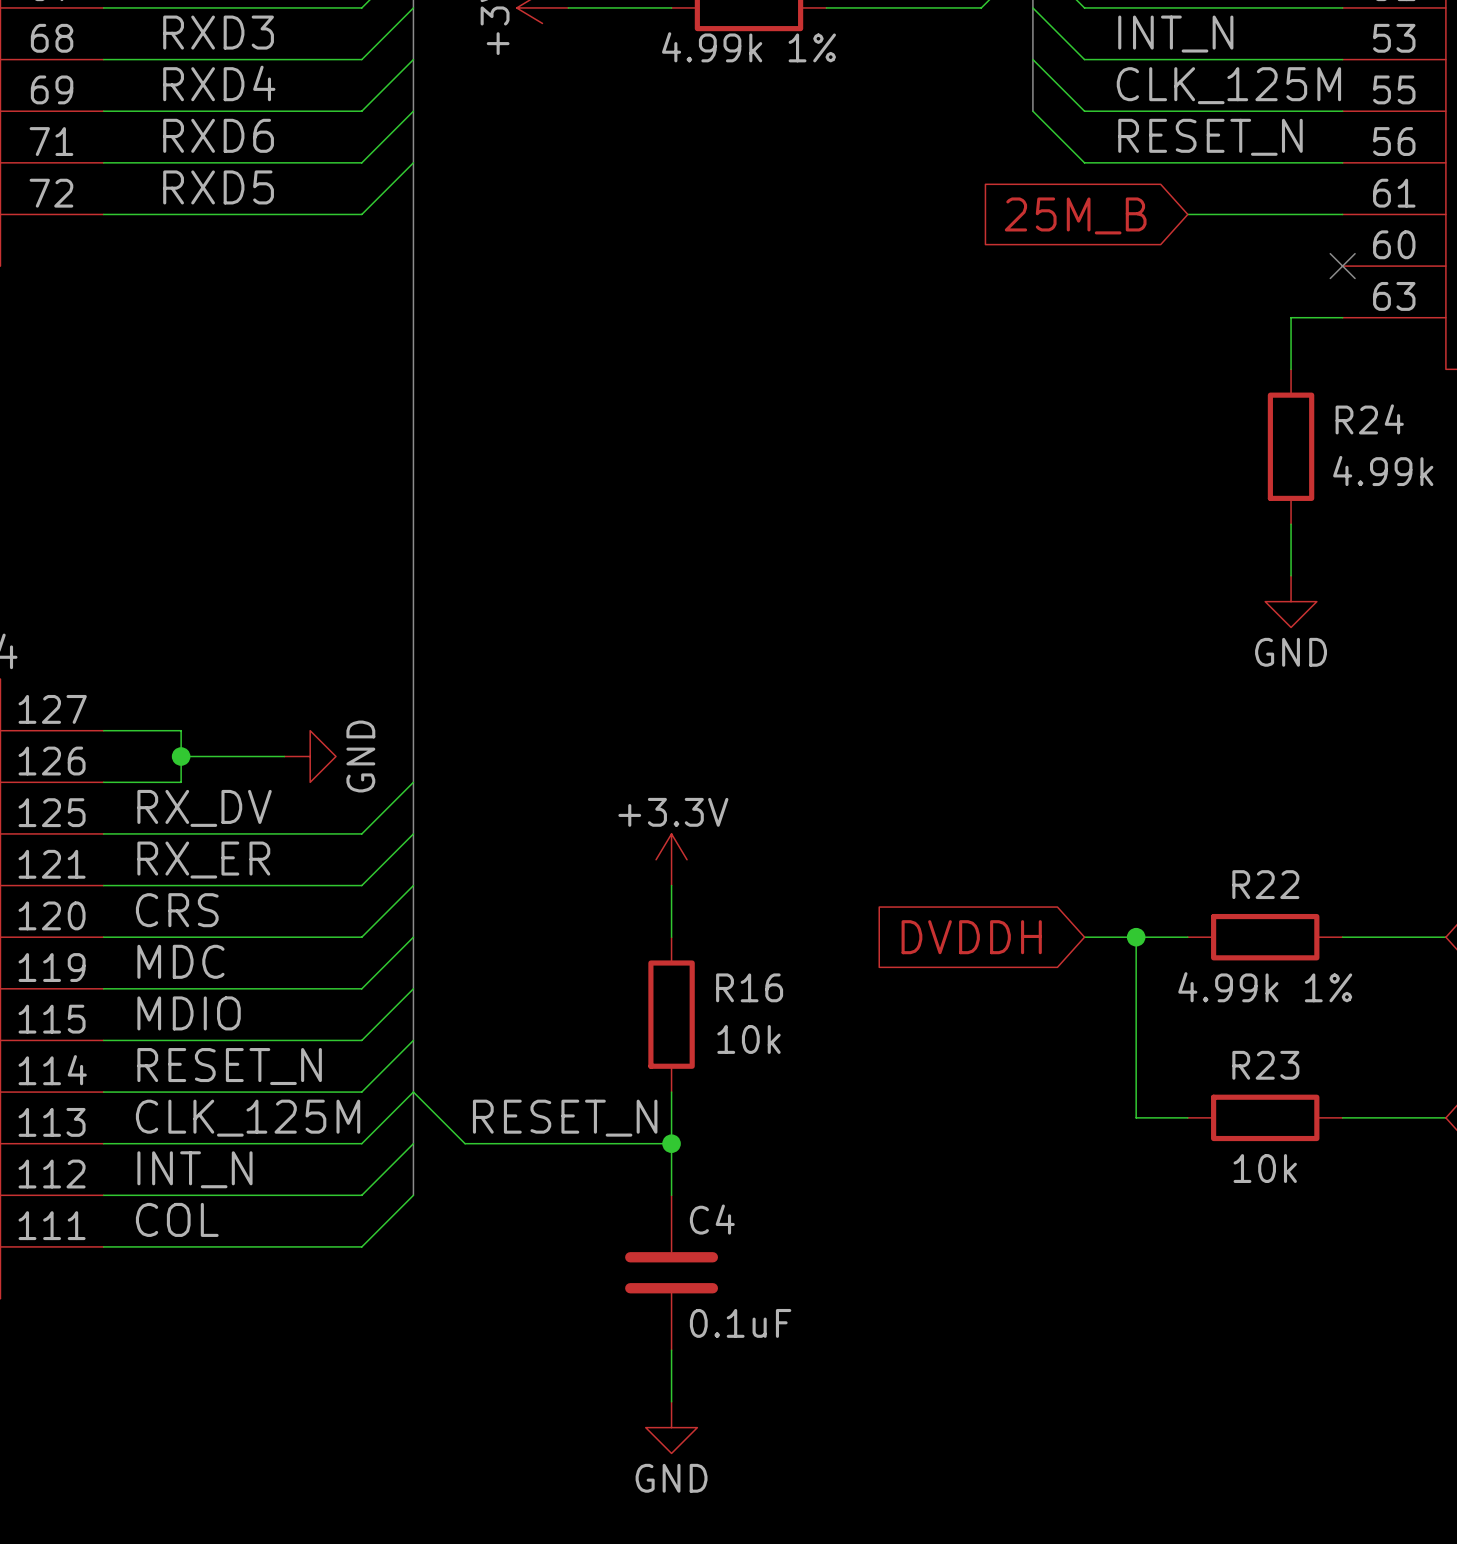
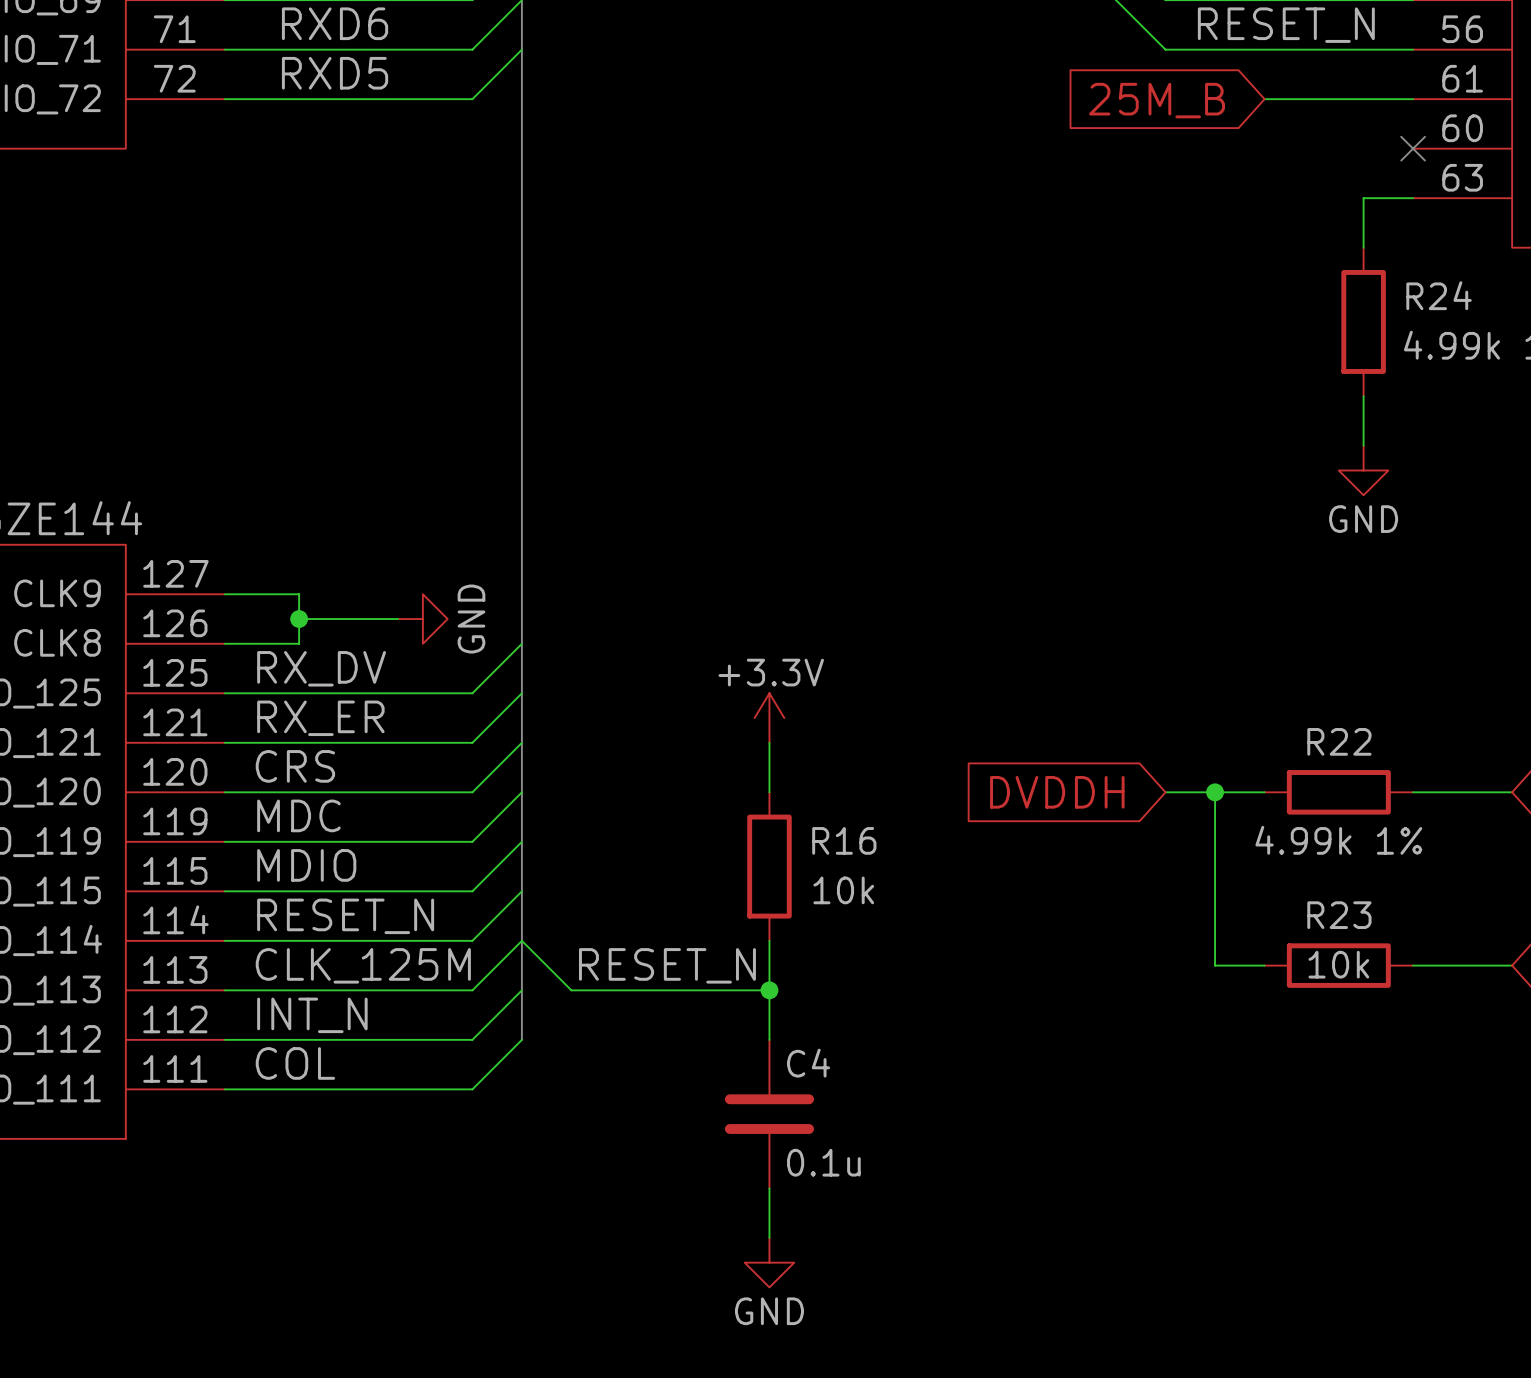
R23 value position: 10k (1265, 1168) -> 10k (1338, 964)
C4 value: 0.1uF (740, 1323) -> 0.1u (823, 1162)

